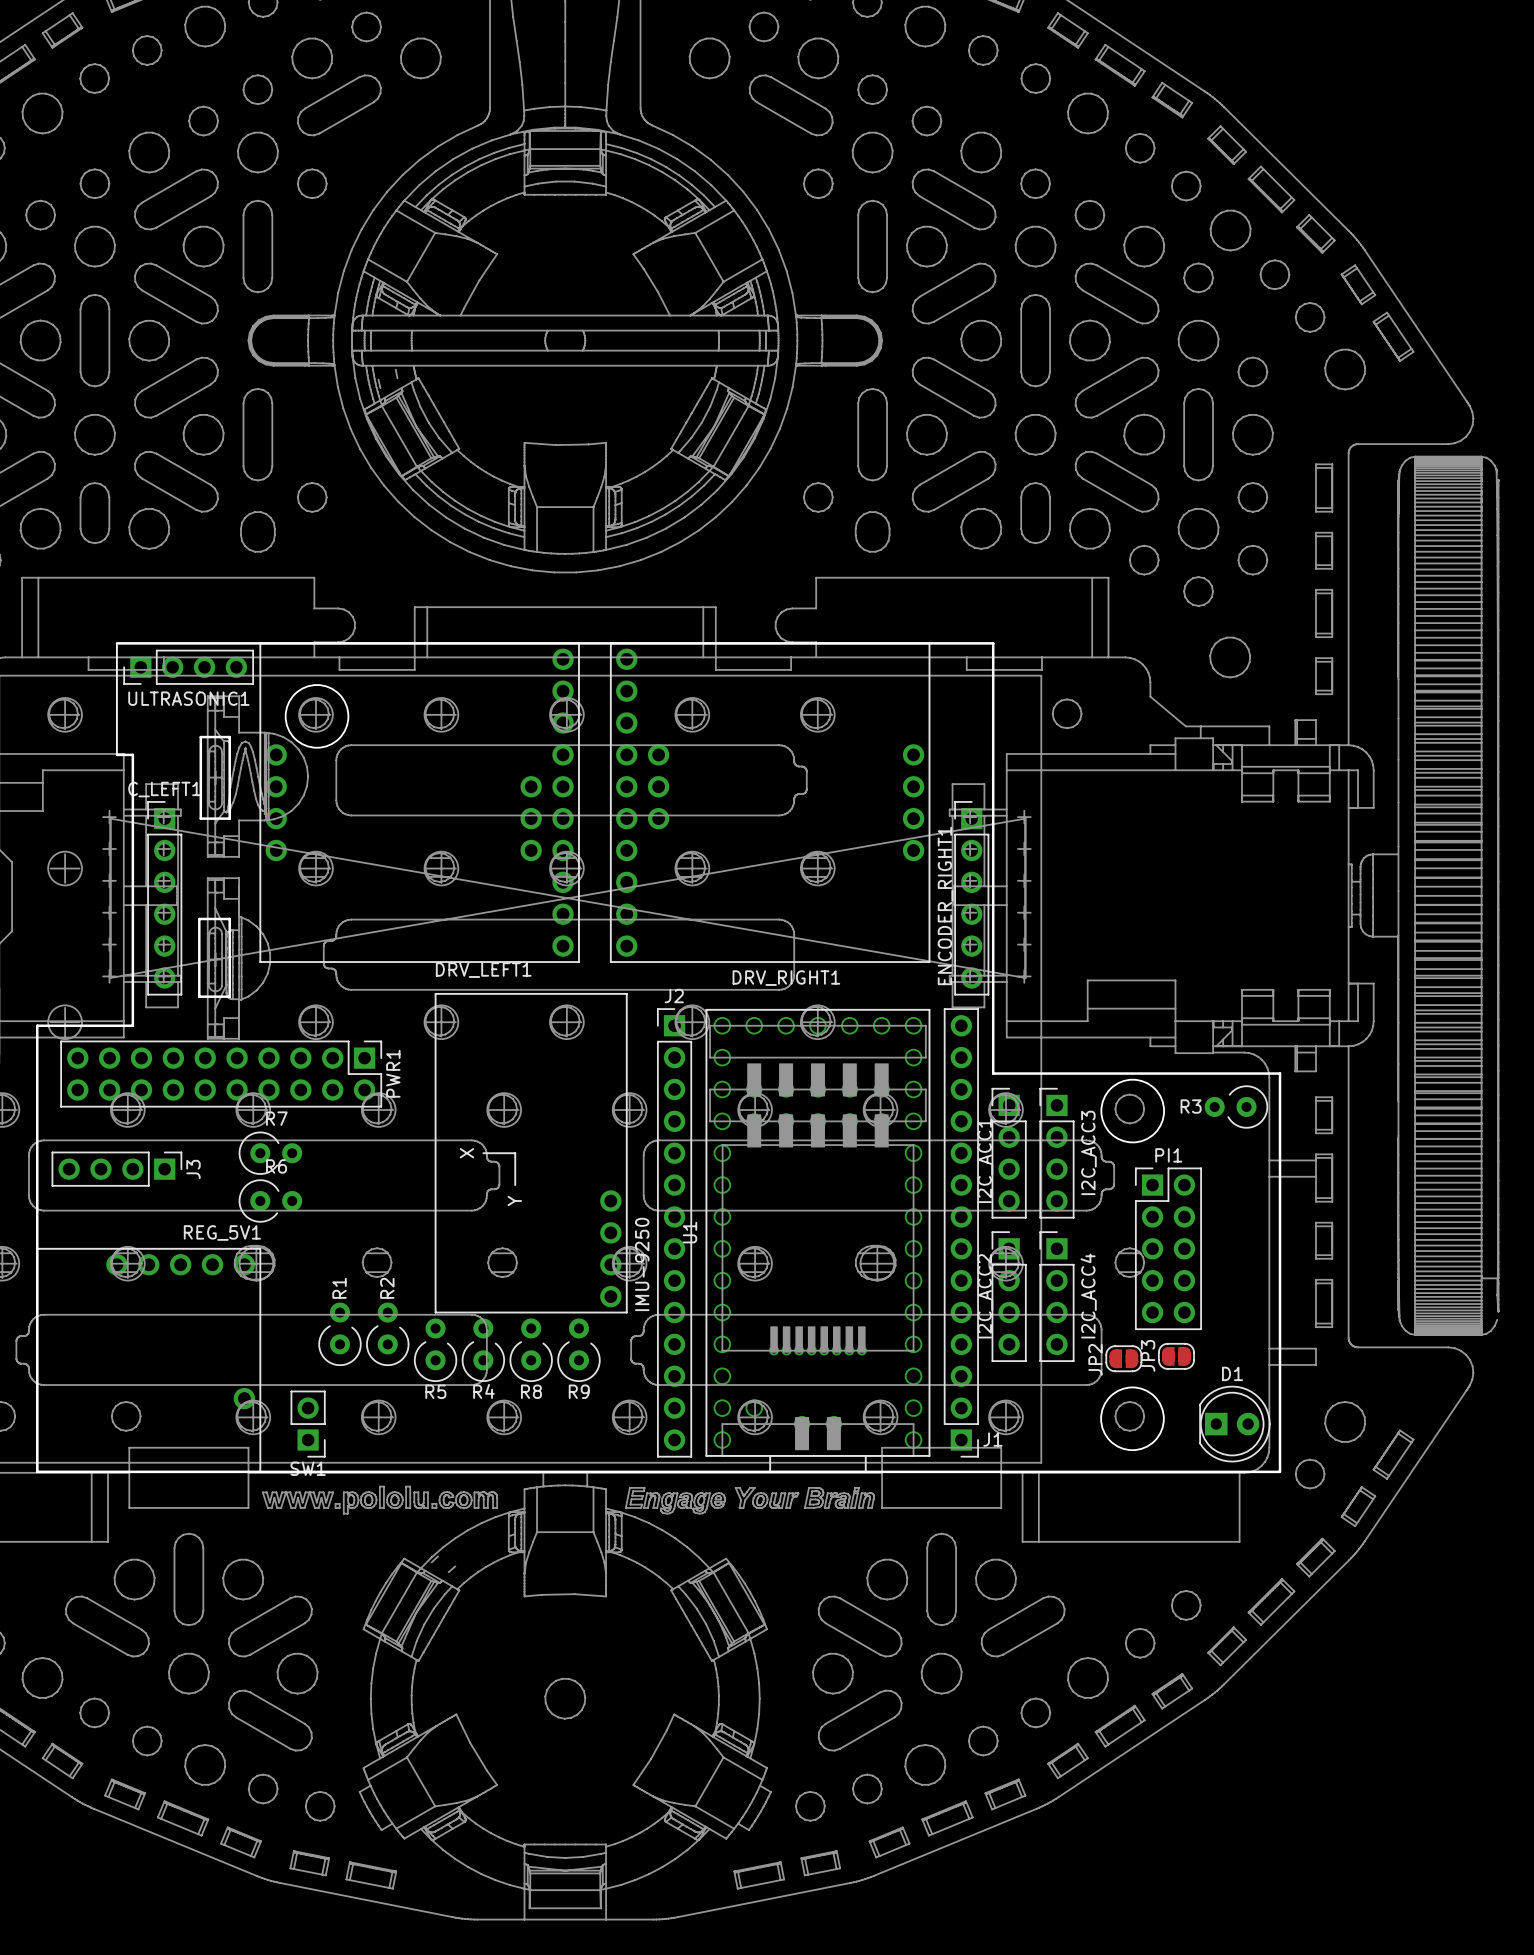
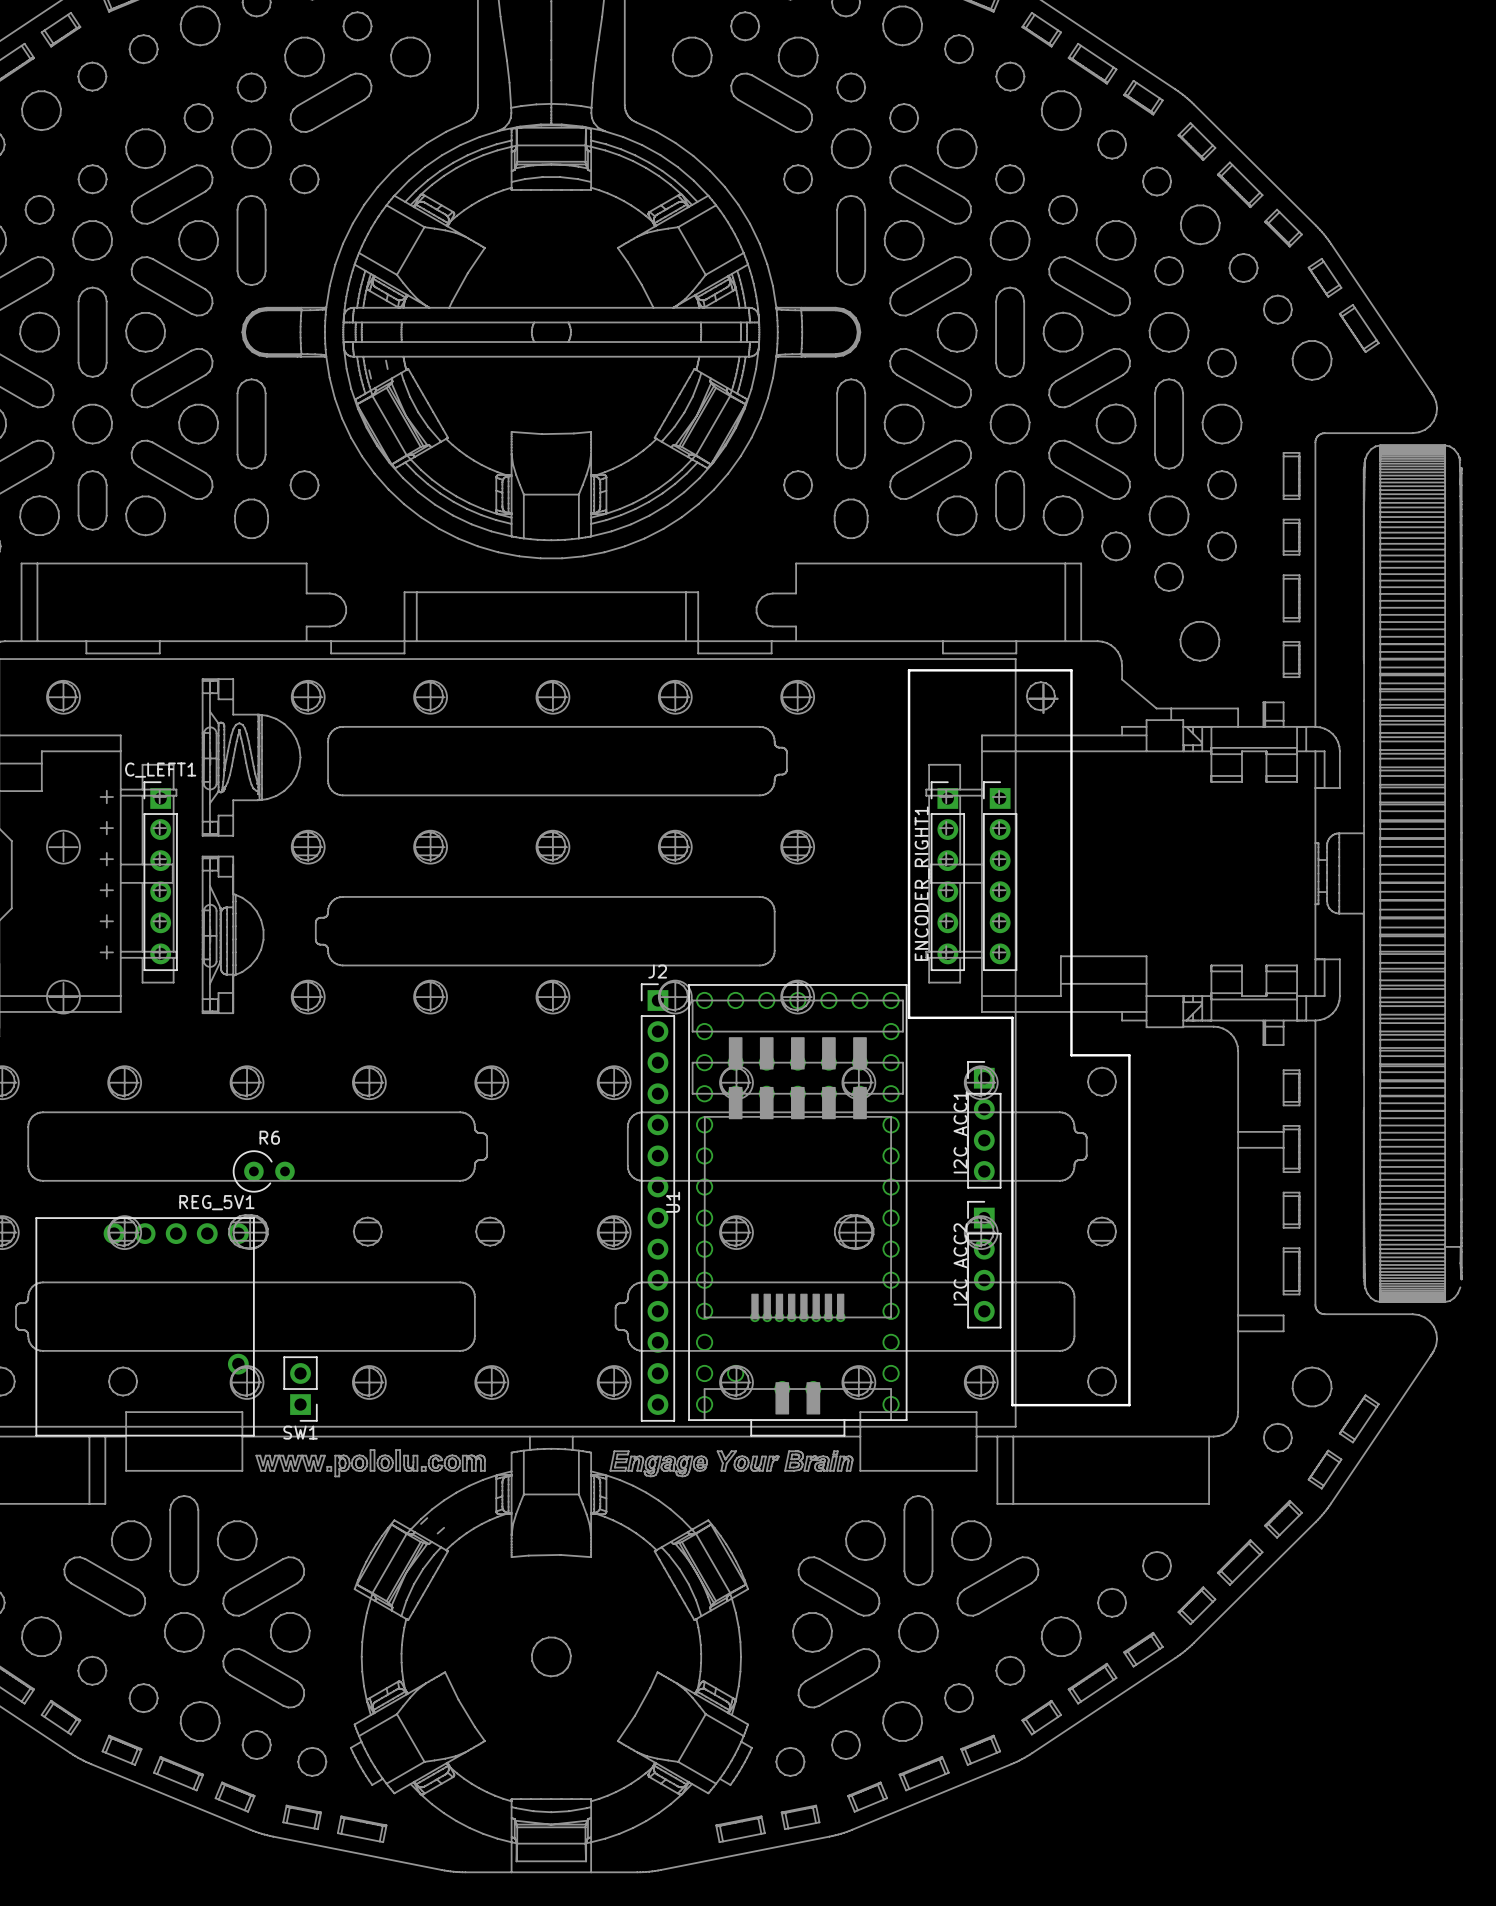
board edge: (116, 643) (116, 754) (132, 754) (132, 1025) (37, 1025) (37, 1471) (1280, 1471) (1280, 1073) (993, 1073) (993, 643) (116, 643) -> none
ULTRASONIC1: (188, 667) -> none
round board edge: [285, 684, 349, 749] -> none
board edge: none -> (909, 670) (909, 1017) (1012, 1017) (1012, 1405) (1129, 1405) (1129, 1055) (1071, 1055) (1071, 670) (909, 670)
line: none -> (1043, 684) (1043, 712)
line: none -> (1029, 698) (1057, 698)
board edge: (200, 737) (200, 818) (229, 818) (229, 737) (200, 737) -> none
DRV_LEFT1: (419, 802) -> none
DRV_RIGHT1: (770, 802) -> none
line: (110, 818) (1025, 977) (1025, 818) (110, 977) (110, 818) -> none
part: none -> (1000, 876)
board edge: (199, 918) (199, 996) (229, 996) (229, 918) (199, 918) -> none
PWR1: (221, 1074) -> none
round board edge: [1101, 1079, 1165, 1143] -> none
R3: (1236, 1107) -> none
R7: (270, 1153) -> none
IMU-9250: (531, 1153) -> none
I2C_ACC3: (1056, 1153) -> none
J3: (116, 1169) -> none
J1: (961, 1232) -> none
PI1: (1168, 1248) -> none
I2C_ACC4: (1056, 1296) -> none
R1: (339, 1334) -> none
R2: (387, 1334) -> none
R5: (435, 1350) -> none
R4: (483, 1350) -> none
R8: (531, 1350) -> none
R9: (578, 1350) -> none
JP3: (1176, 1356) -> none
JP2: (1123, 1358) -> none
round board edge: [1100, 1387, 1165, 1451] -> none
D1: (1234, 1424) -> none

